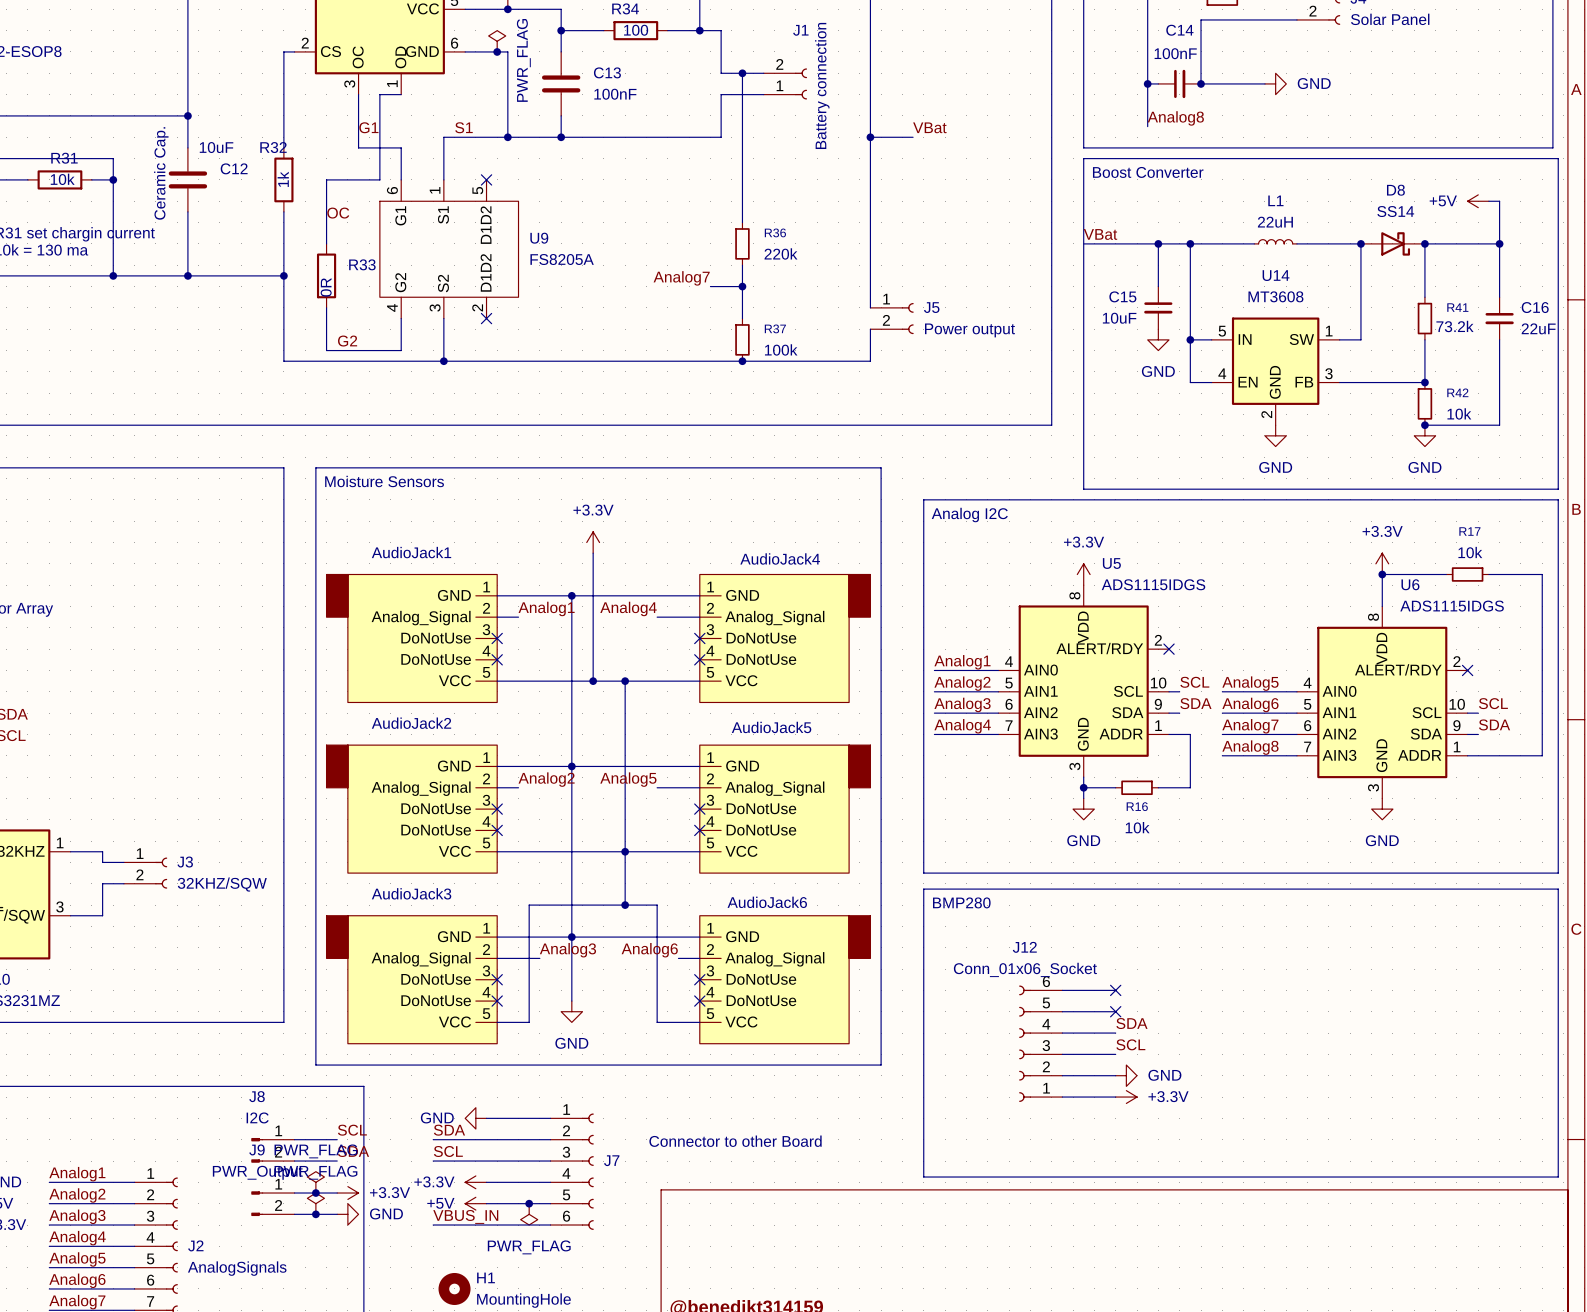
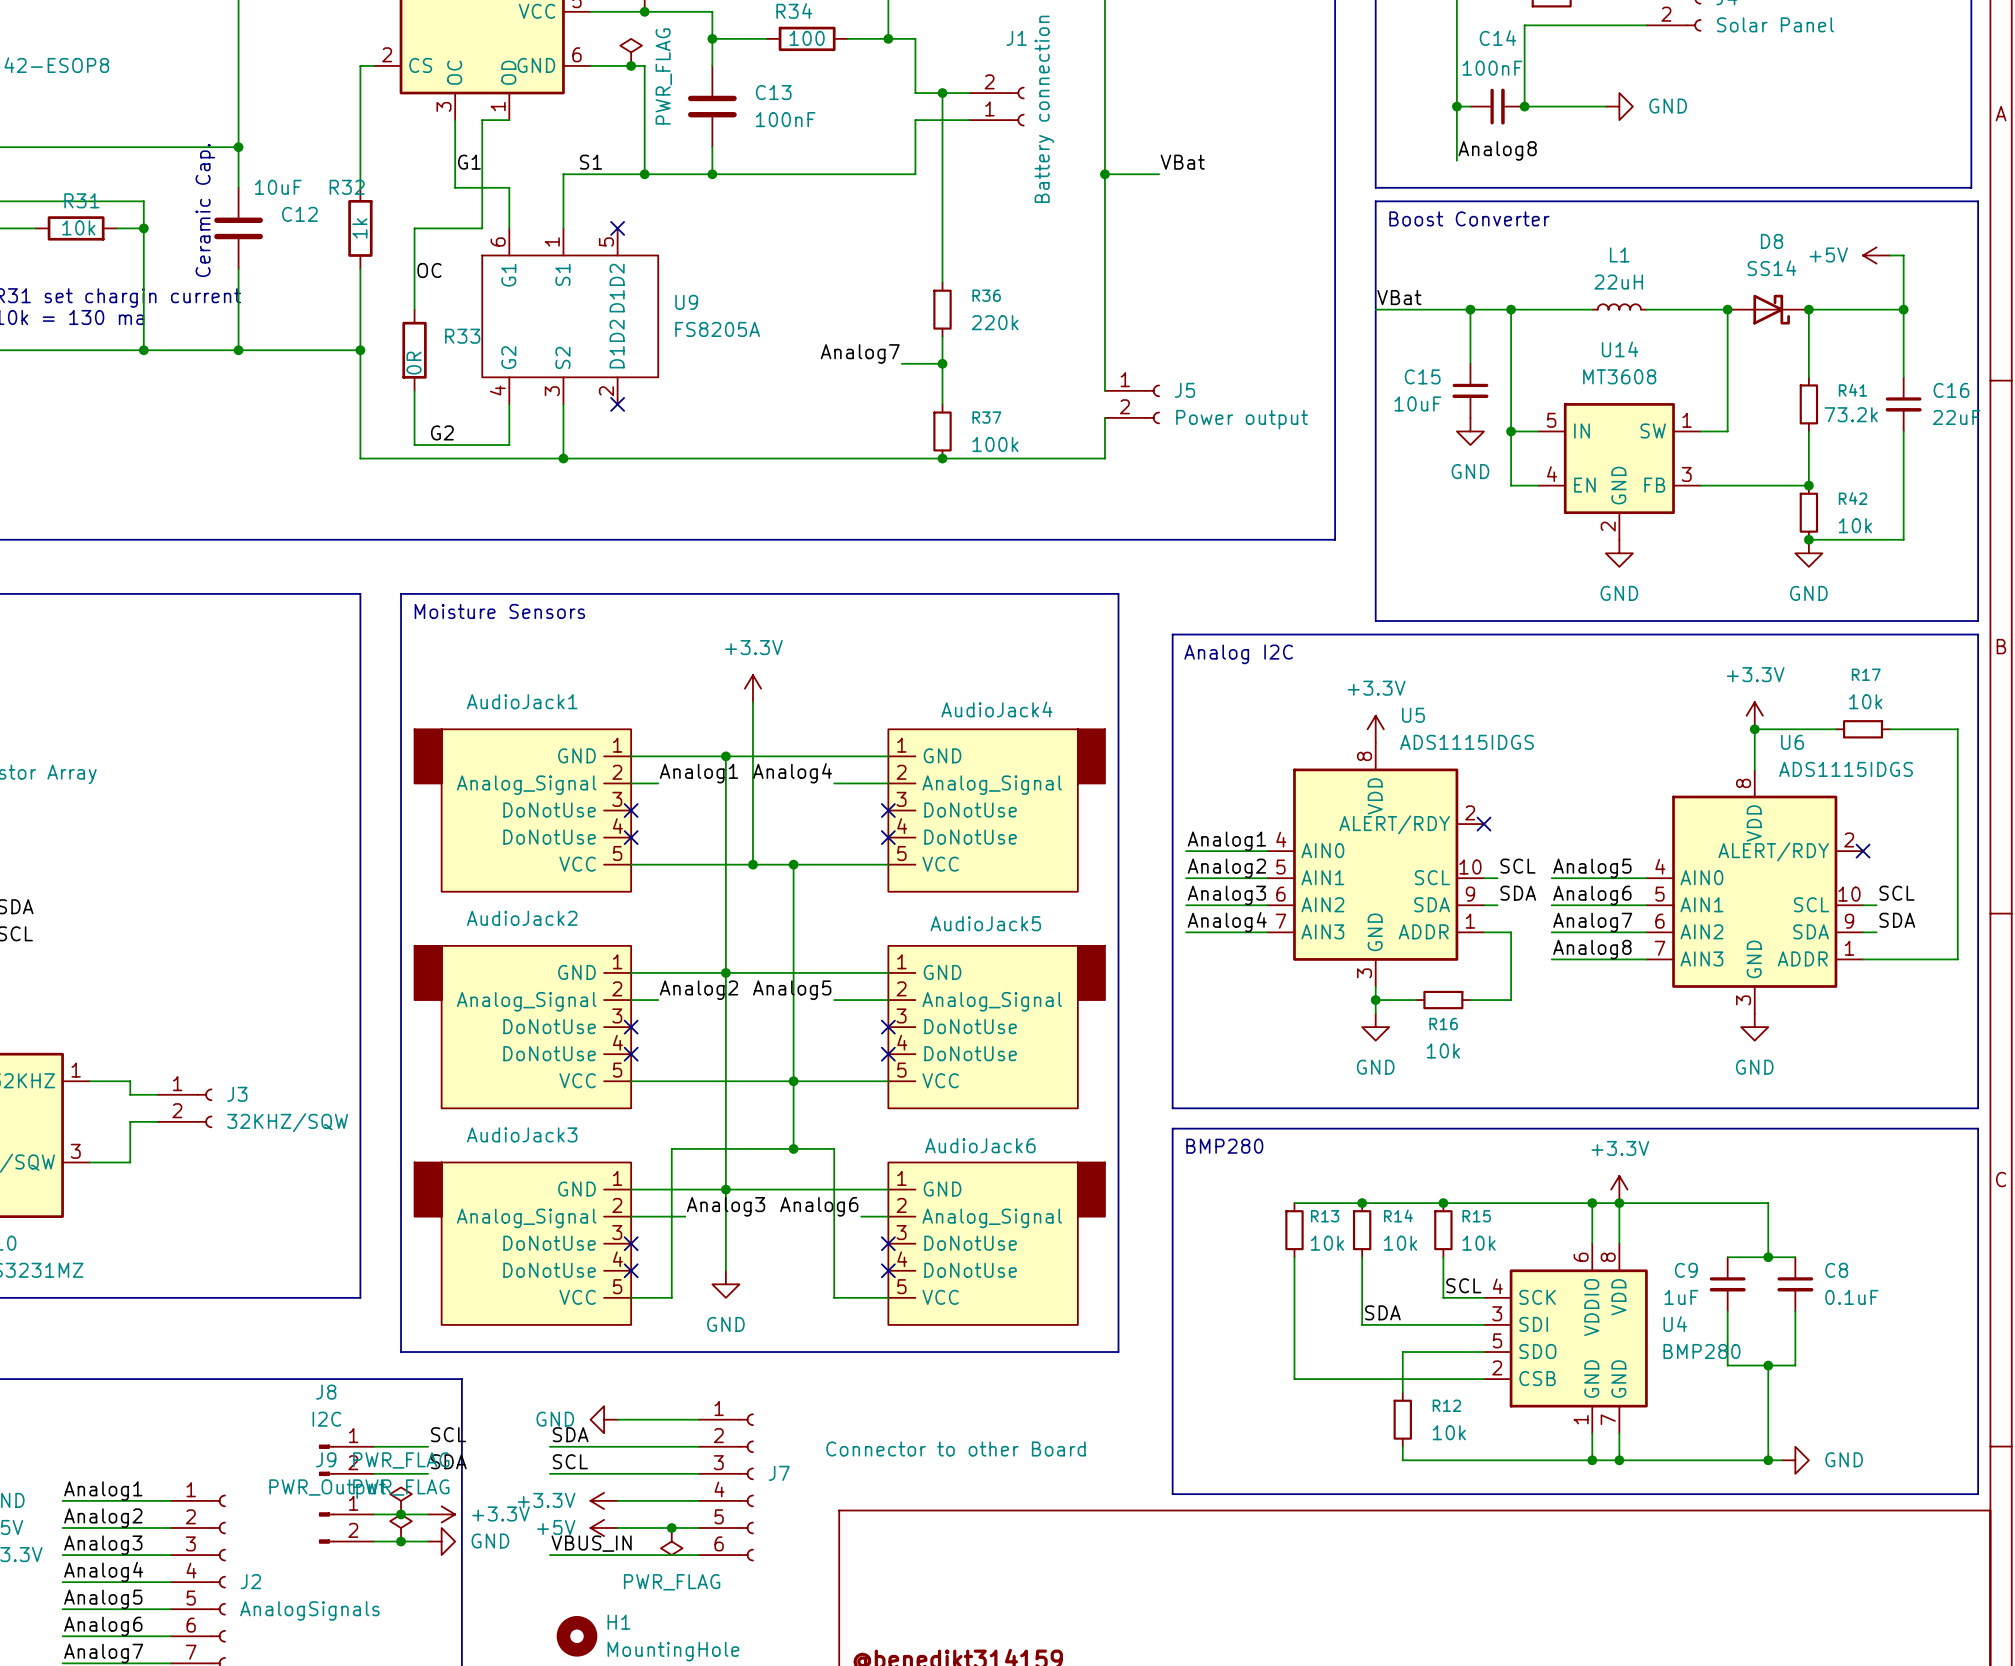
power symbol: none -> +3.3V (1619, 1189)
wire: none -> (1294, 1203) (1768, 1203) (1768, 1257)
junction: none -> (1362, 1203)
junction: none -> (1443, 1203)
wire: none -> (1592, 1203) (1592, 1243)
junction: none -> (1592, 1203)
wire: none -> (1619, 1203) (1619, 1243)
junction: none -> (1619, 1203)
R13: none -> 10k (1294, 1230)
R14: none -> 10k (1362, 1230)
R15: none -> 10k (1443, 1230)
wire: none -> (1294, 1257) (1294, 1379) (1483, 1379)
wire: (1062, 990) (1115, 990) -> none
wire: none -> (1362, 1257) (1362, 1324) (1483, 1324)
no-connect mark: (1115, 990) -> none
wire: none -> (1443, 1257) (1443, 1297) (1483, 1297)
wire: none -> (1727, 1257) (1795, 1257)
junction: none -> (1768, 1257)
wire: (1062, 1011) (1115, 1011) -> none
no-connect mark: (1115, 1011) -> none
C9: none -> 1uF (1727, 1284)
C8: none -> 0.1uF (1795, 1284)
label position: SDA (1131, 1023) -> SDA (1382, 1312)
wire: (1062, 1033) (1115, 1033) -> none
wire: none -> (1727, 1311) (1727, 1365) (1795, 1365) (1795, 1311)
J12: Conn_01x06_Socket (1040, 1043) -> none
label position: SCL (1130, 1044) -> SCL (1463, 1285)
wire: (1062, 1054) (1115, 1054) -> none
U4: none -> BMP280 (1565, 1338)
wire: none -> (1483, 1352) (1402, 1352) (1402, 1392)
wire: (1062, 1075) (1115, 1075) -> none
power symbol: GND (1126, 1075) -> none
wire: none -> (1768, 1365) (1768, 1460)
junction: none -> (1768, 1365)
wire: (1062, 1097) (1115, 1097) -> none
power symbol: +3.3V (1126, 1097) -> none
R12: none -> 10k (1402, 1419)
wire: none -> (1592, 1433) (1592, 1460)
wire: none -> (1619, 1433) (1619, 1460)
wire: none -> (1402, 1446) (1402, 1460) (1781, 1460)
junction: none -> (1592, 1460)
junction: none -> (1619, 1460)
junction: none -> (1768, 1460)
power symbol: none -> GND (1795, 1460)

